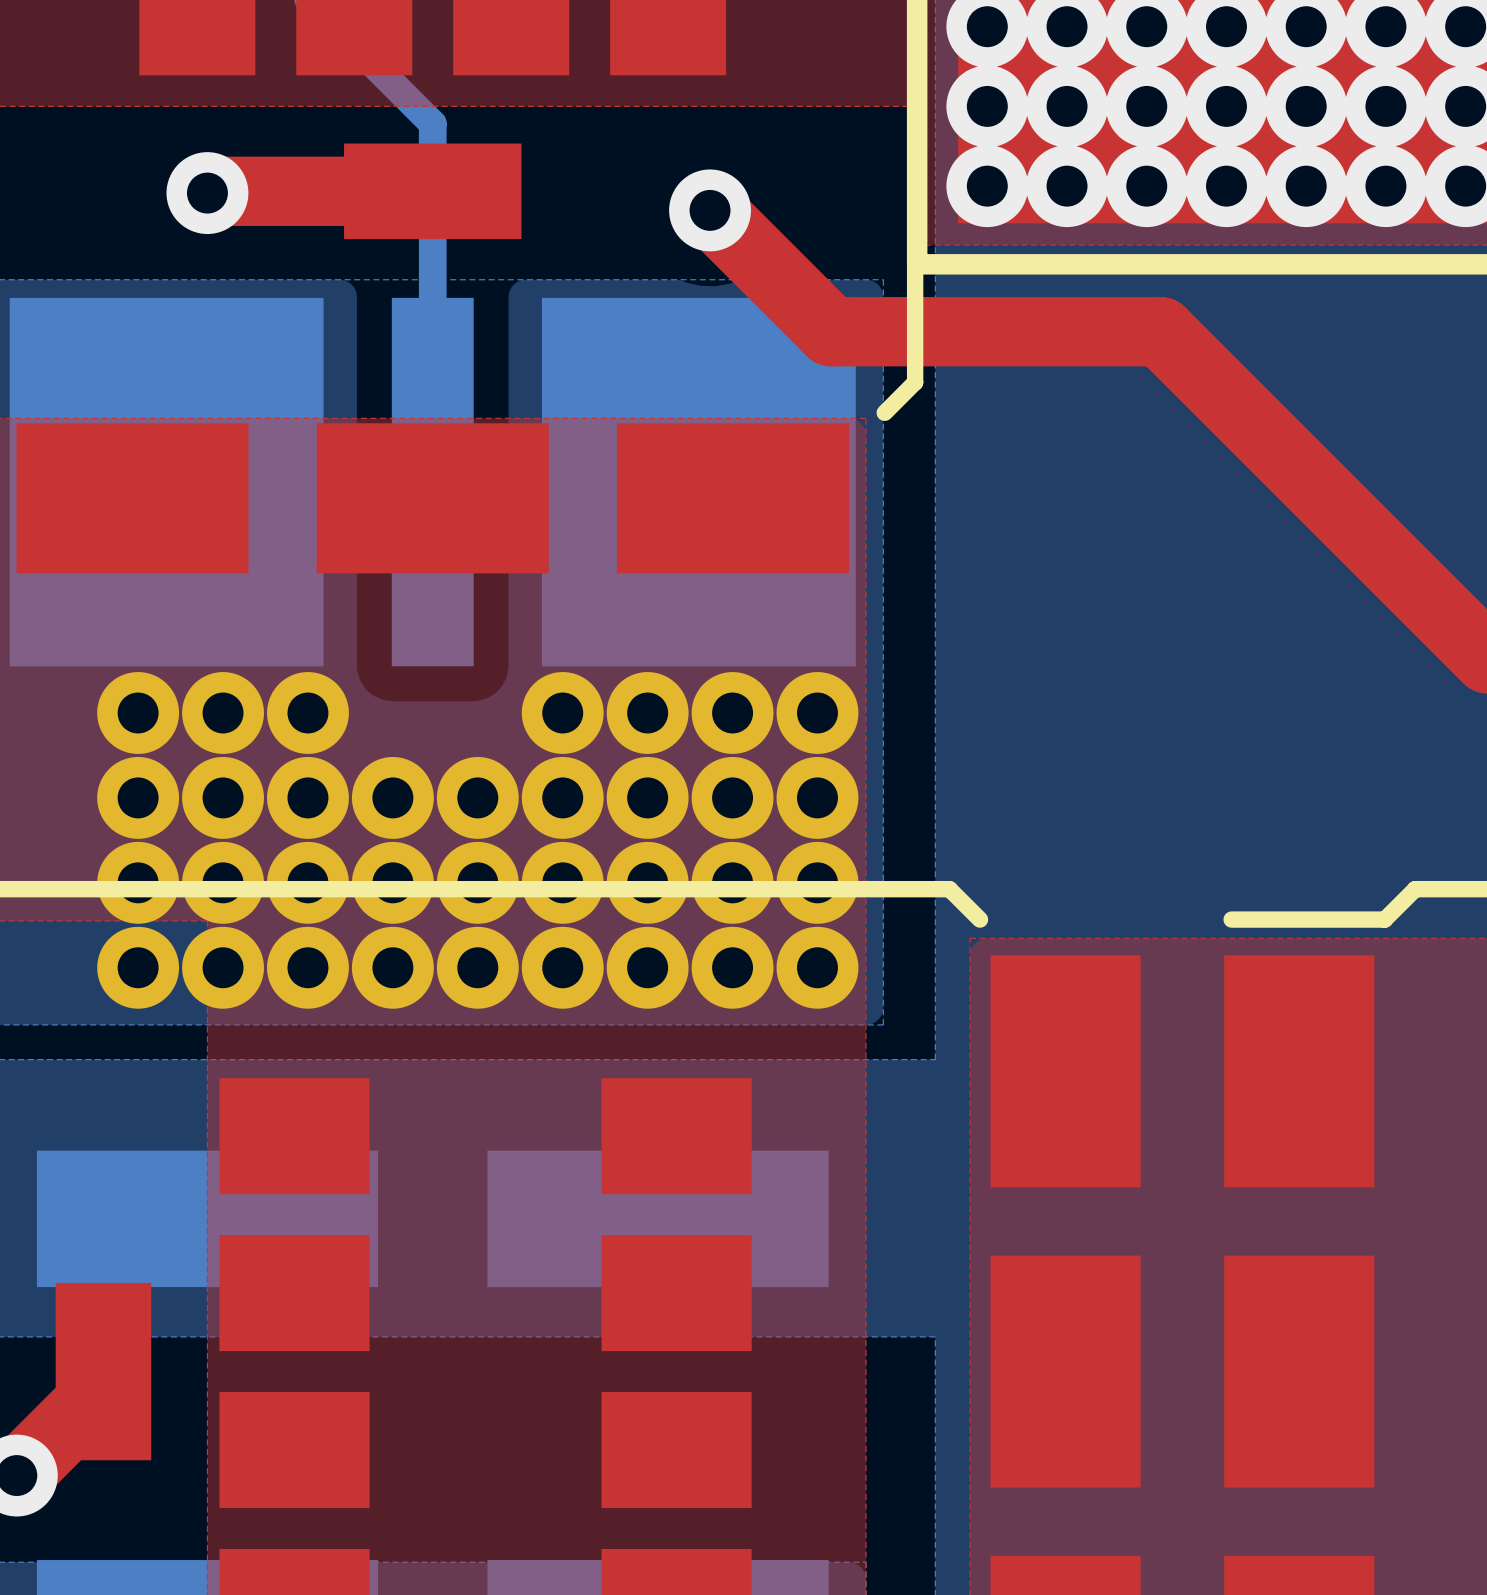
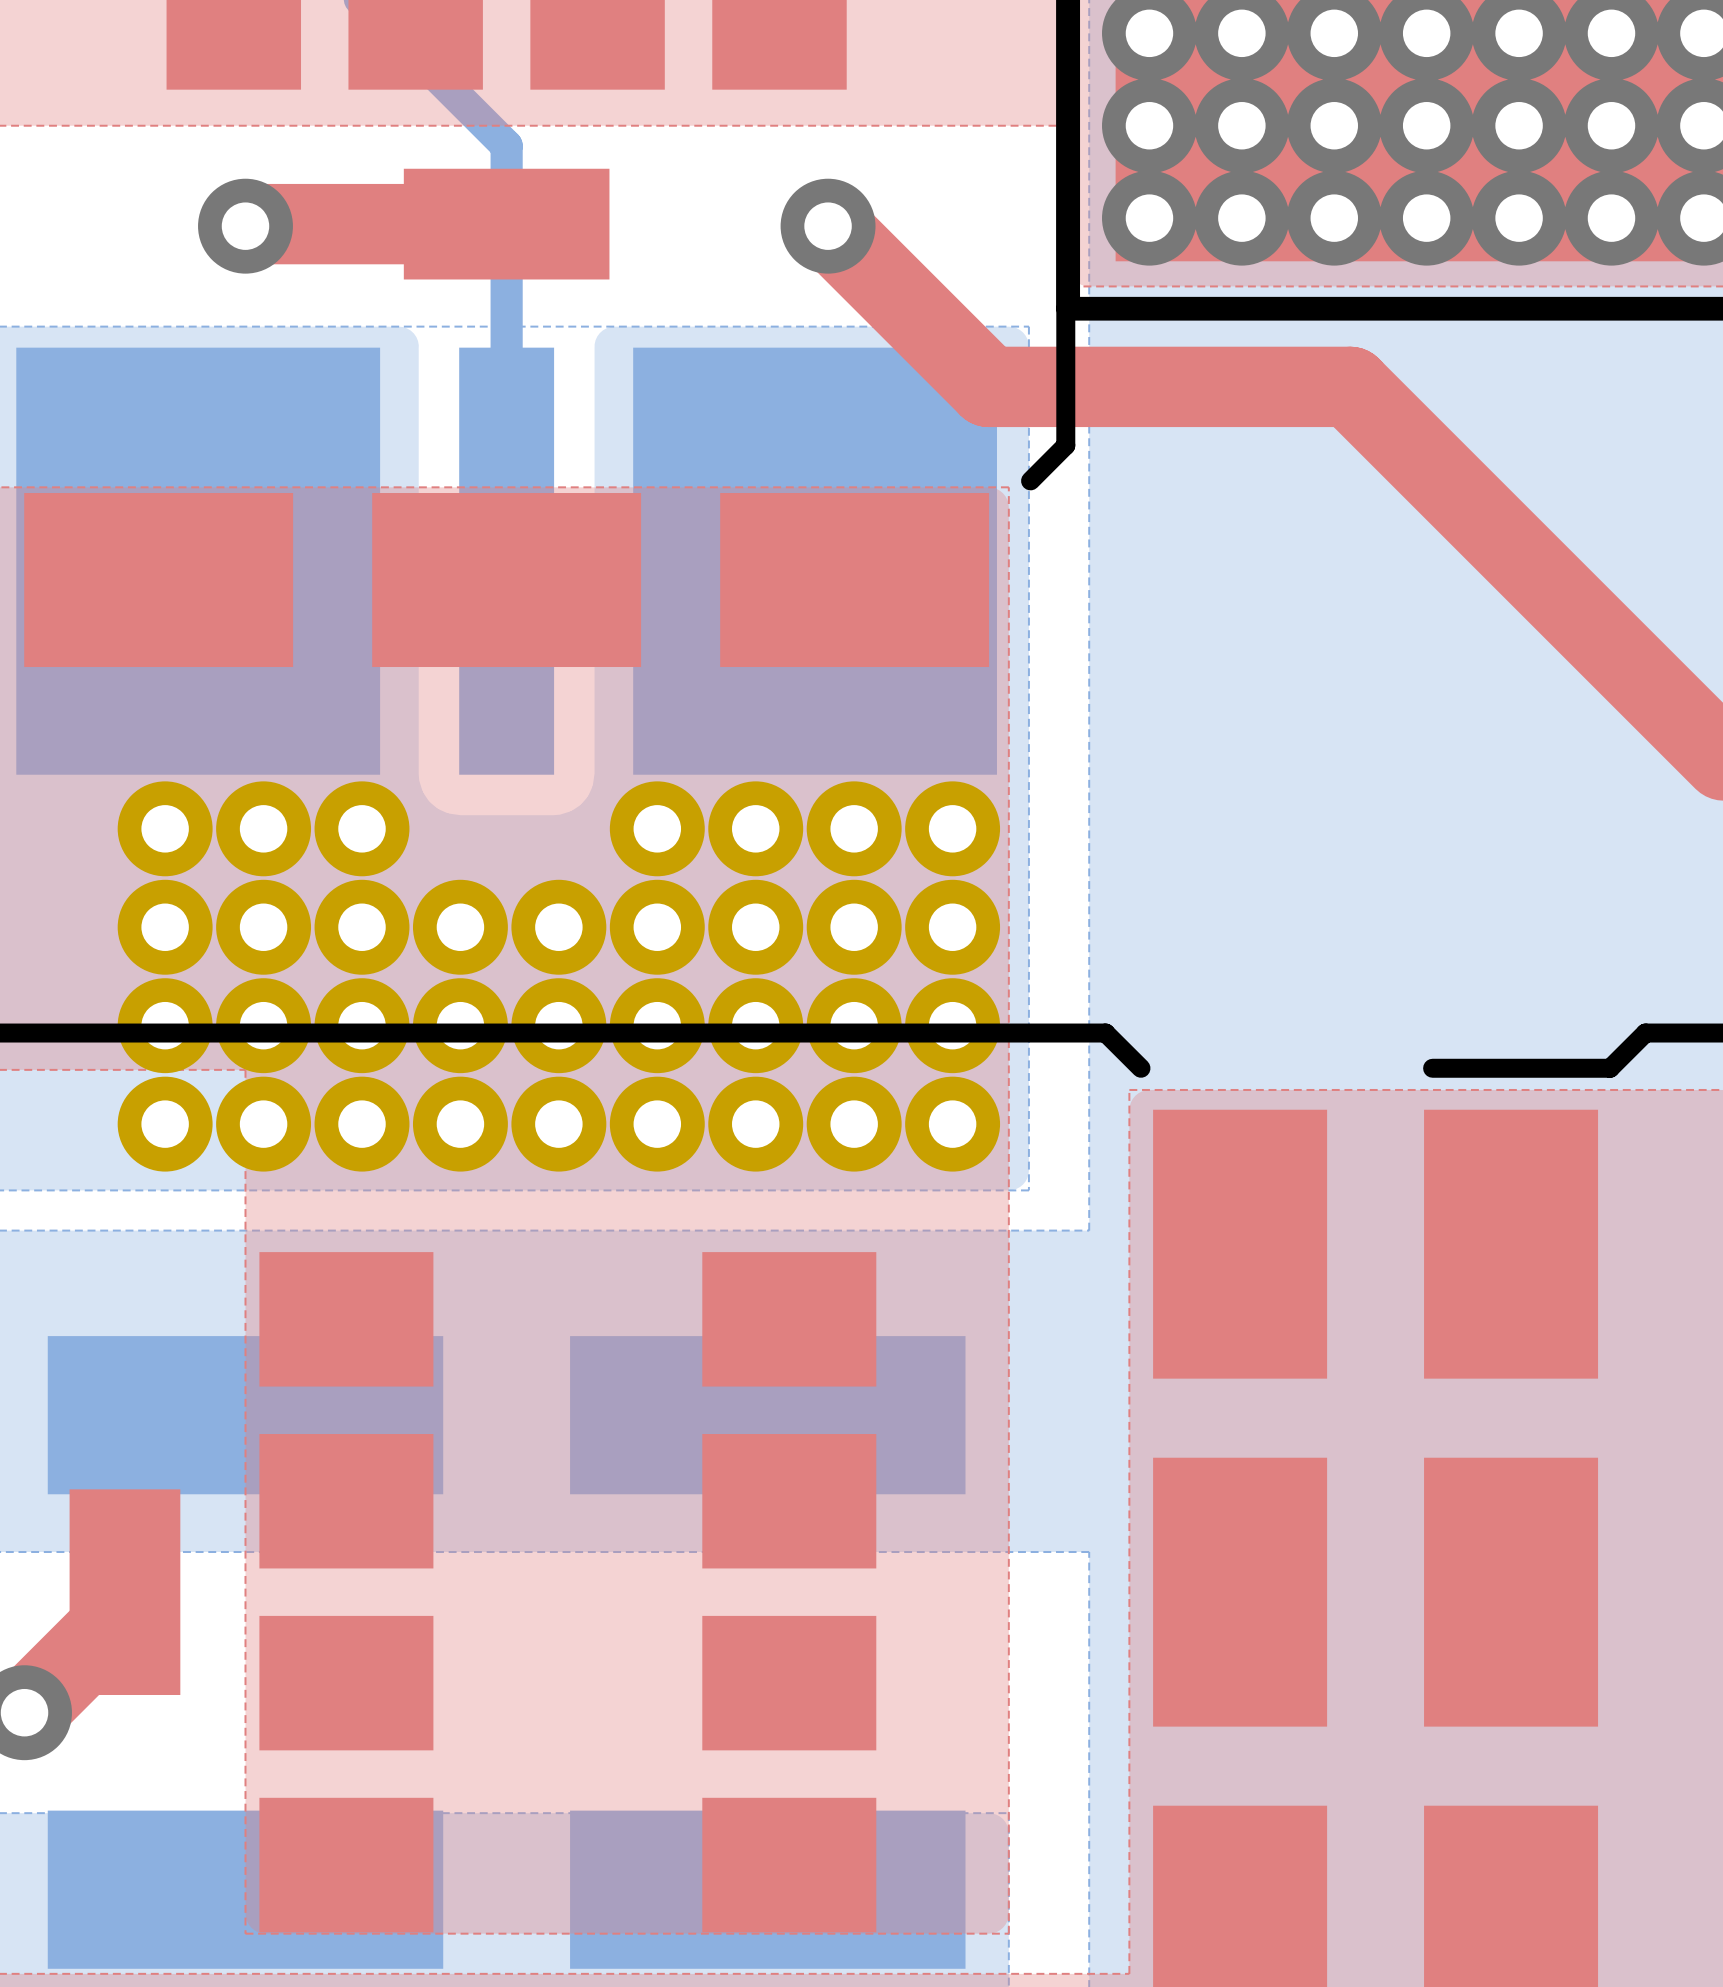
top track: (710, 210) (831, 331) (848, 331) -> (828, 226) (988, 386)
via position: (710, 210) -> (828, 226)

